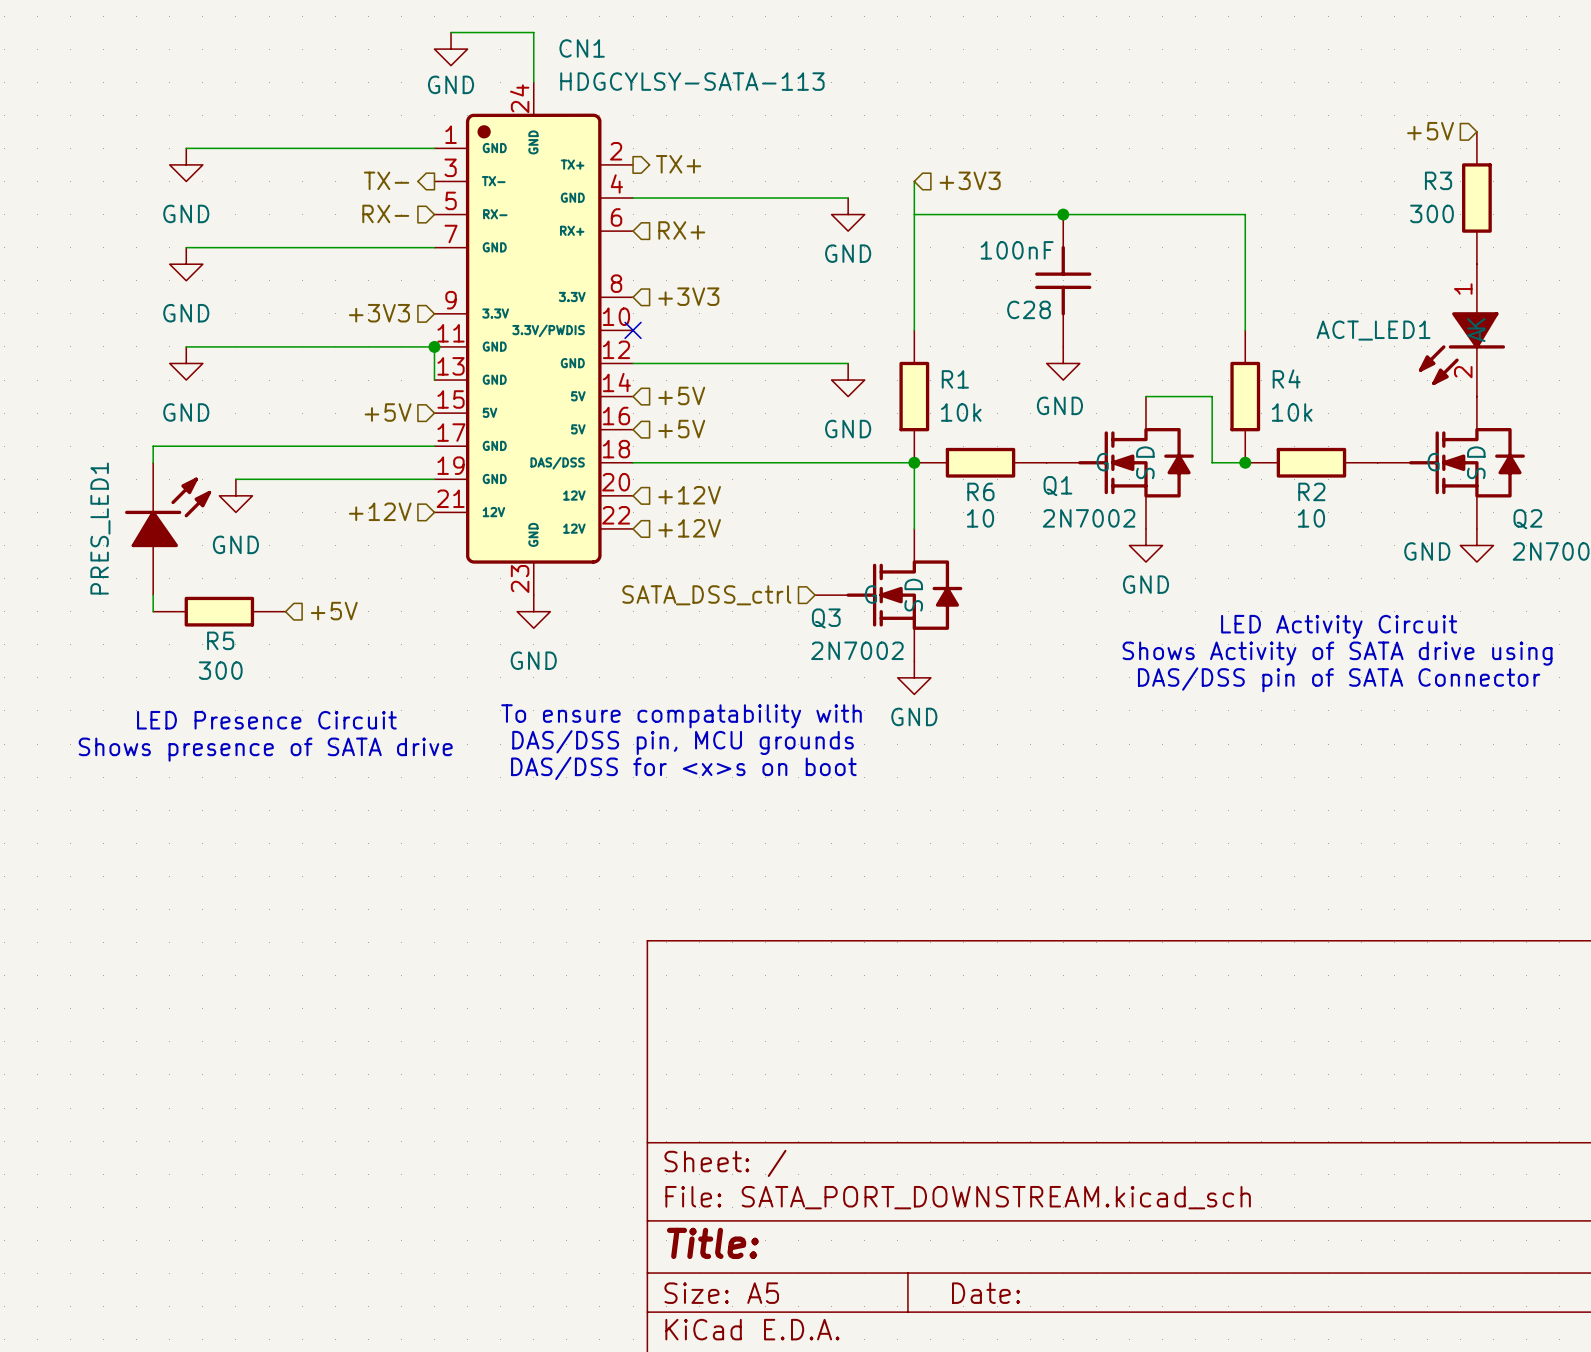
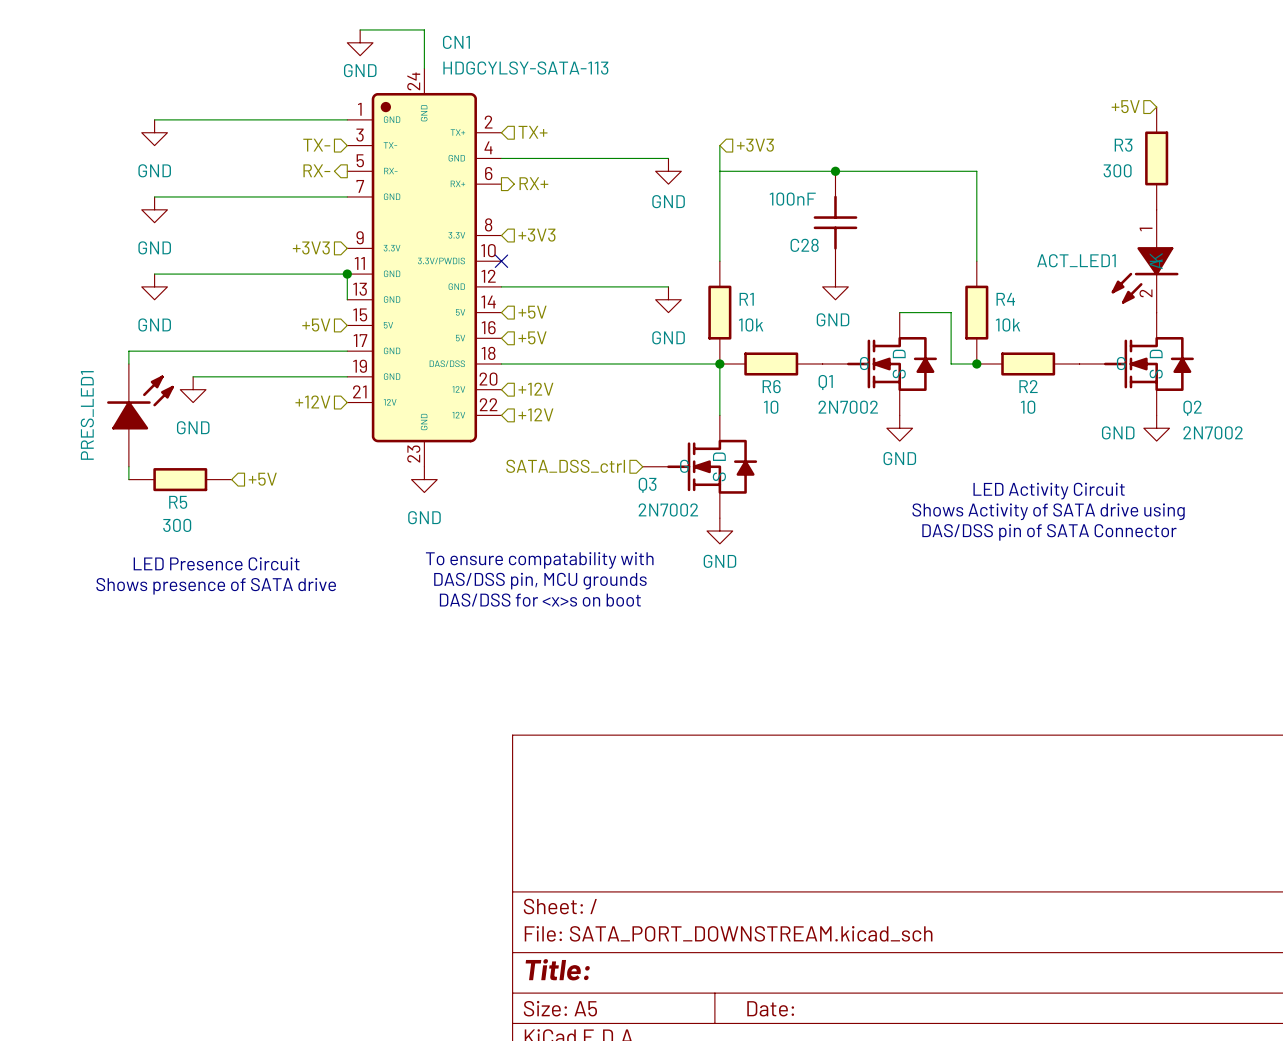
hierarchical label shape: output (678, 164) -> input (533, 132)
hierarchical label shape: output (386, 180) -> input (316, 145)
hierarchical label shape: input (385, 213) -> output (316, 170)
hierarchical label shape: input (681, 230) -> output (533, 183)

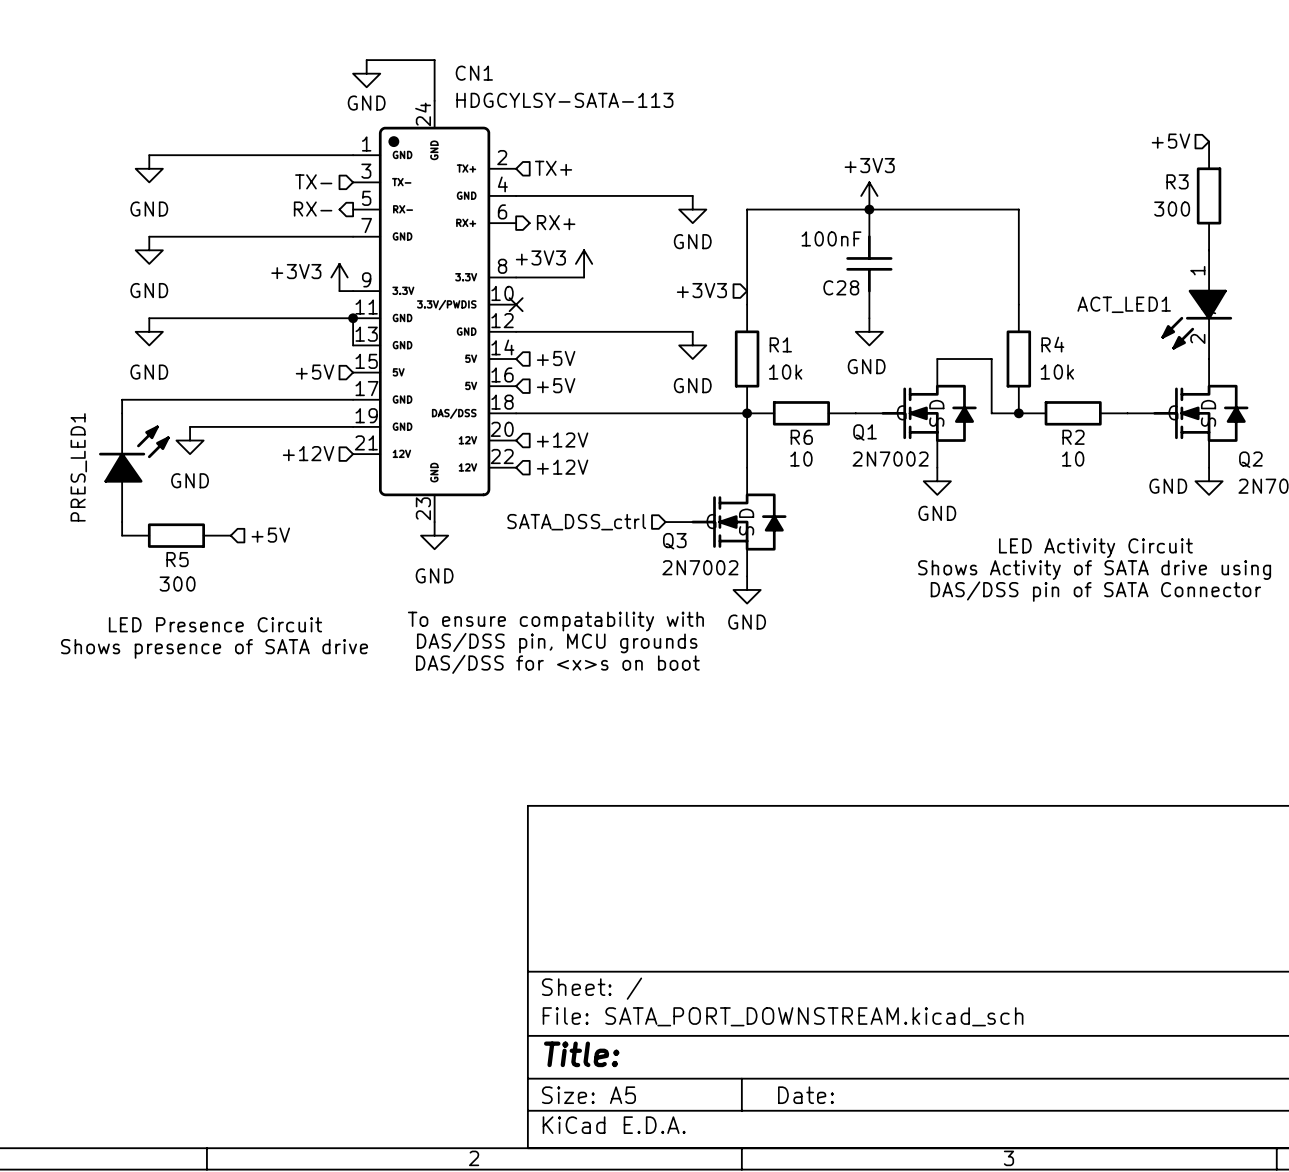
wire: (719, 145) (719, 171) -> none
hierarchical label: +3V3 (755, 145) -> none
power symbol: none -> +3V3 (869, 195)
power symbol: none -> +3V3 (584, 263)
power symbol: none -> +3V3 (339, 277)
wire: none -> (516, 277) (584, 277)
hierarchical label: +3V3 (536, 235) -> none
hierarchical label: +3V3 (311, 247) -> none
hierarchical label: none -> +3V3 (701, 290)
wire: none -> (339, 291) (353, 291)

